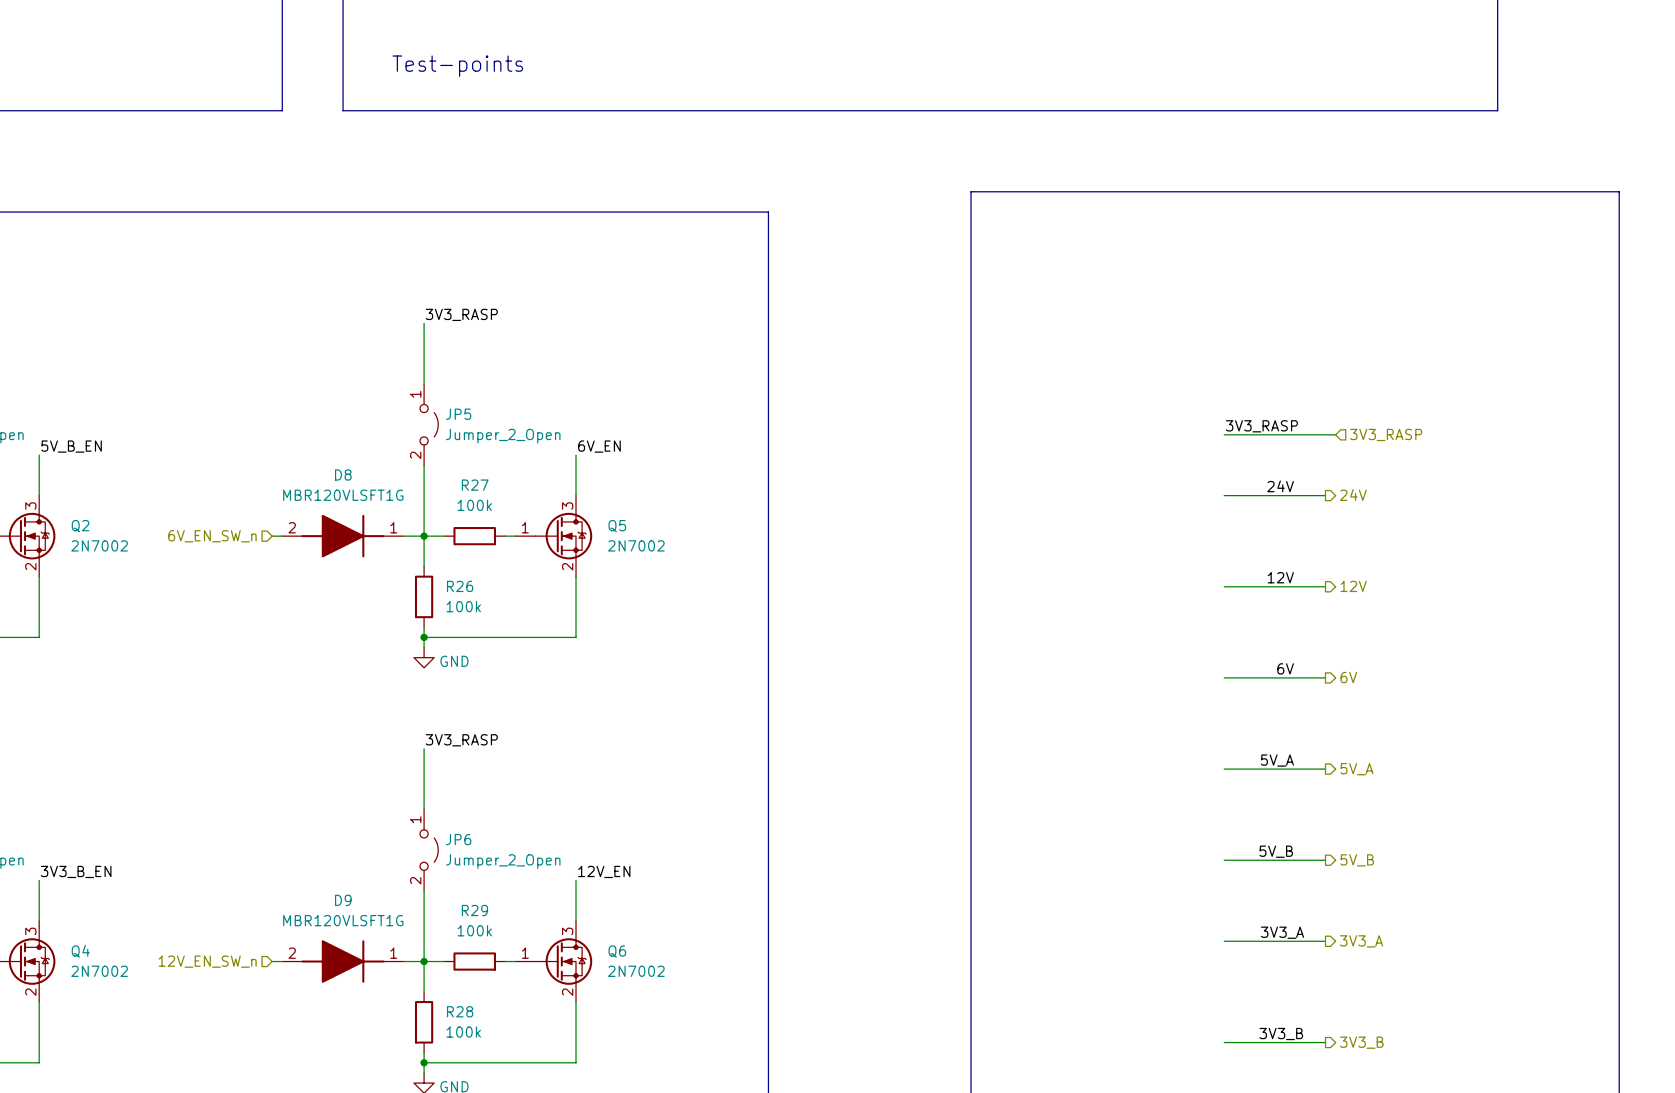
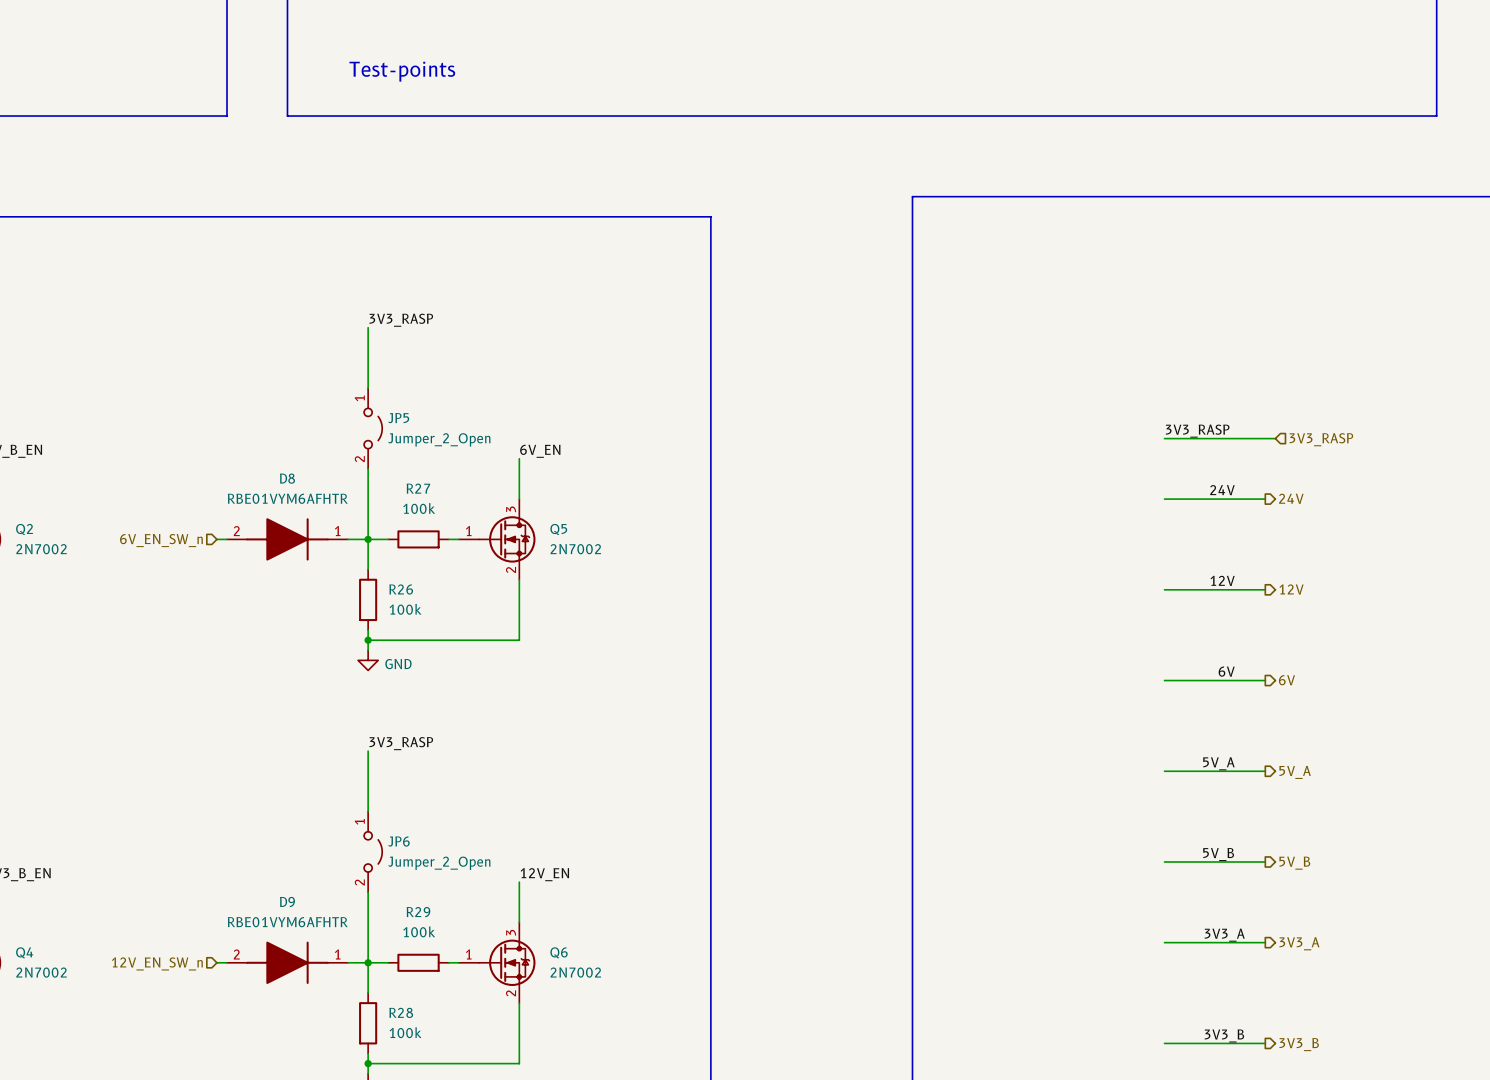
D8 value: MBR120VLSFT1G (343, 495) -> RBE01VYM6AFHTR (287, 498)
D9 value: MBR120VLSFT1G (343, 920) -> RBE01VYM6AFHTR (287, 922)

